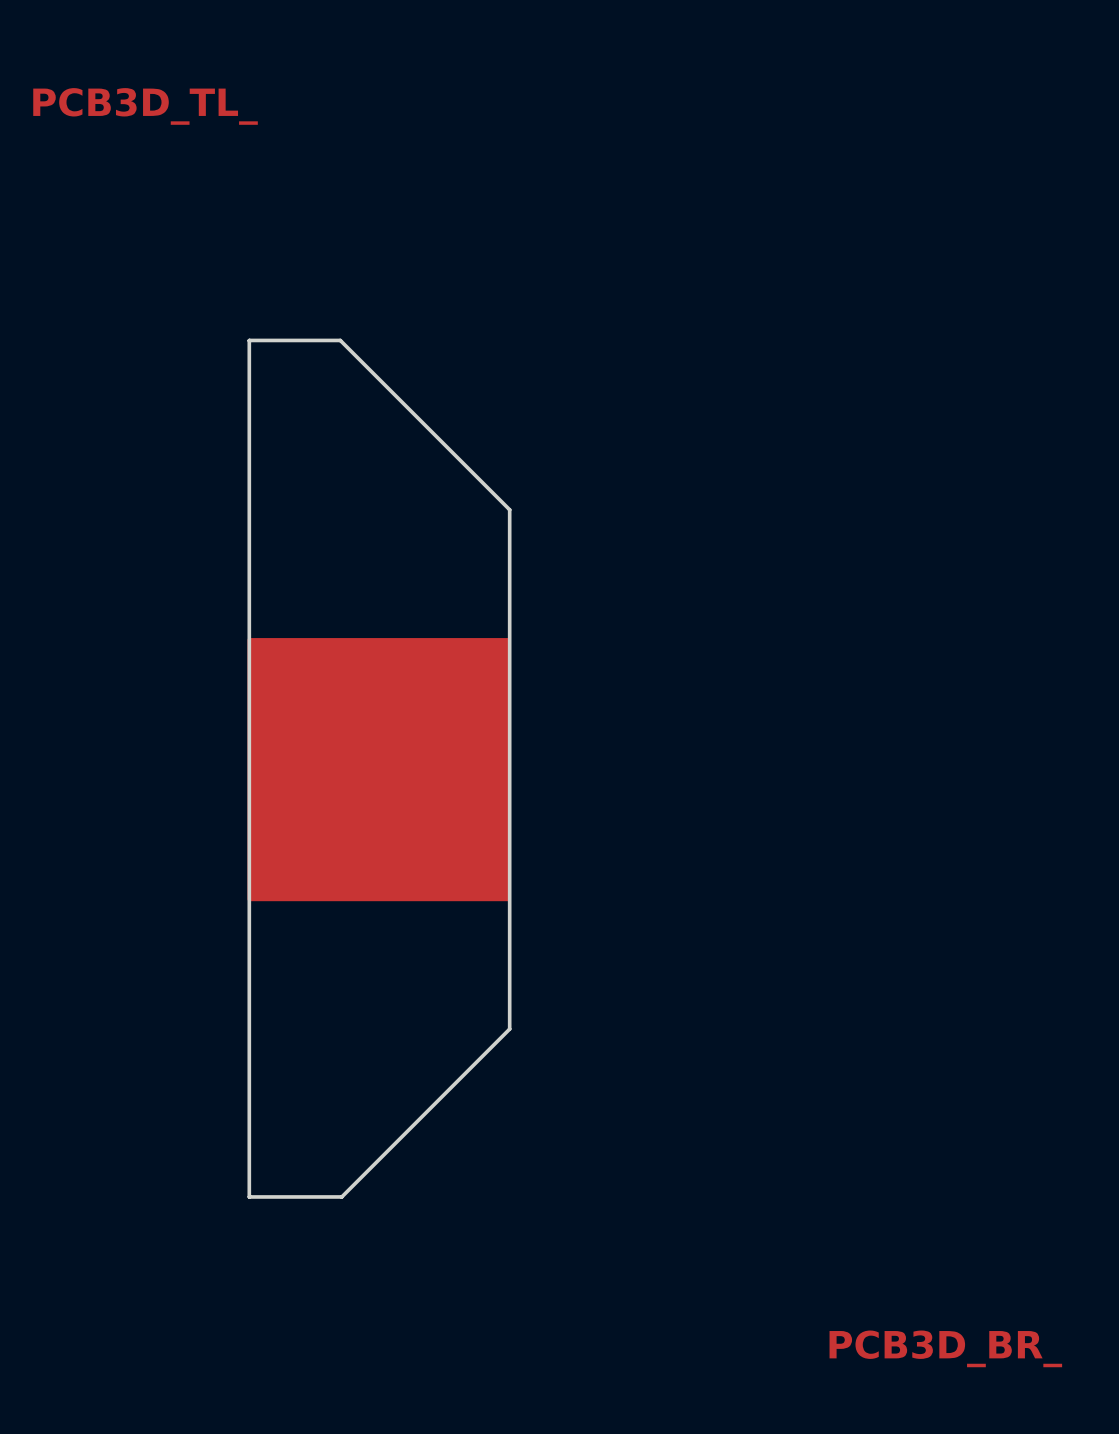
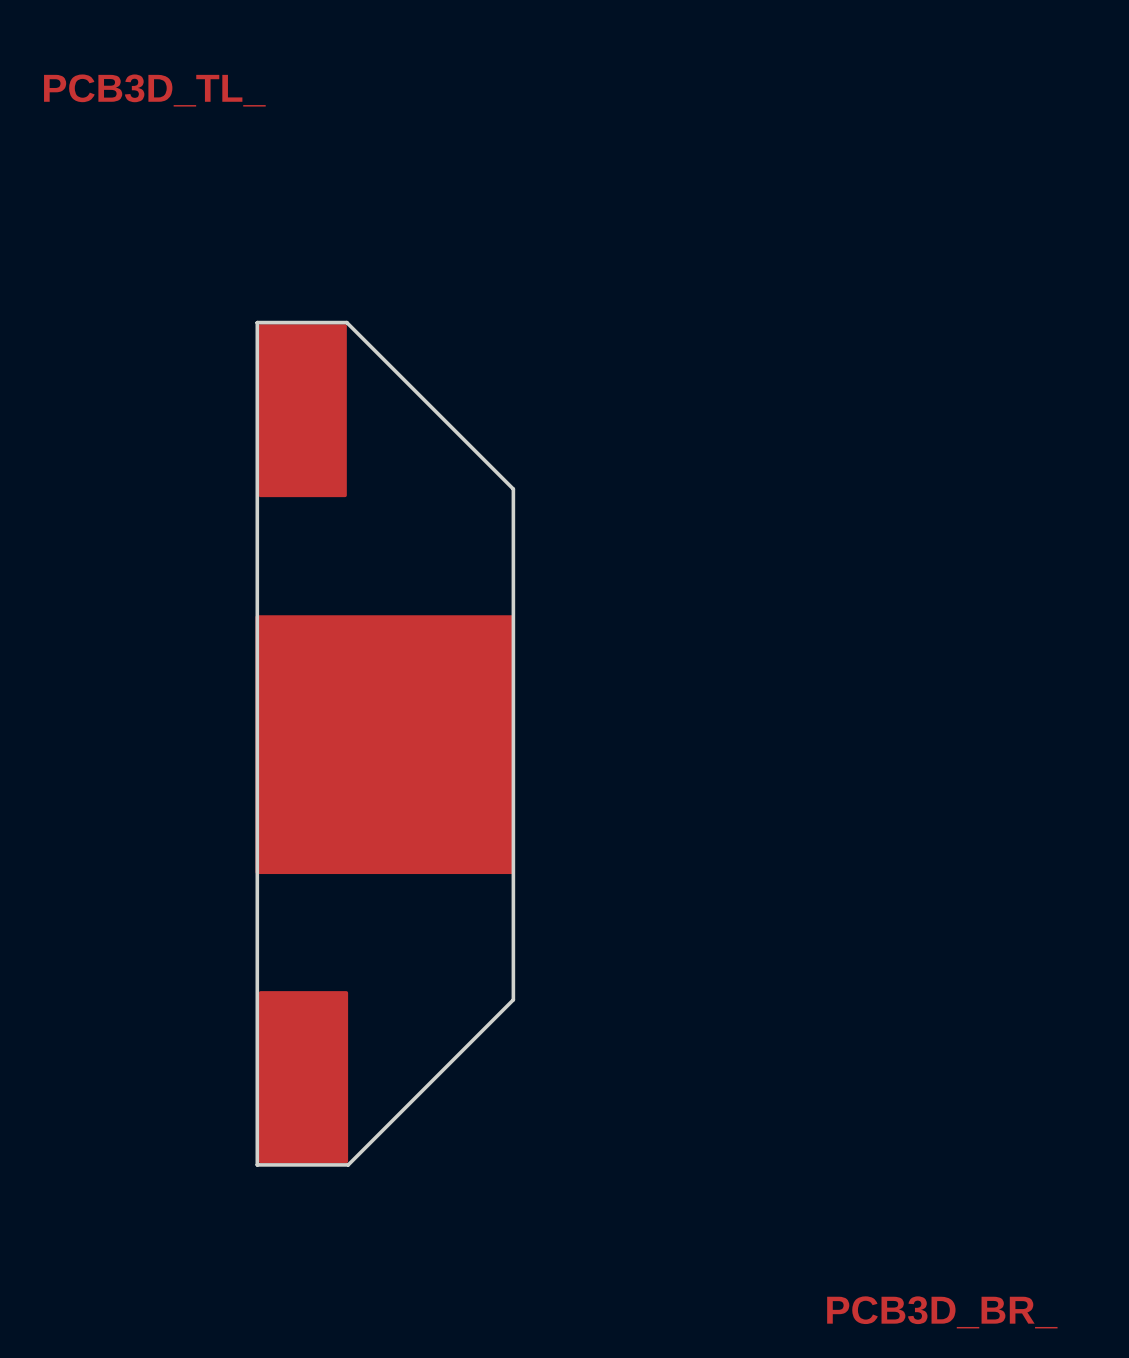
drawing: none -> [258, 324, 347, 498]
drawing: none -> [258, 991, 349, 1164]

